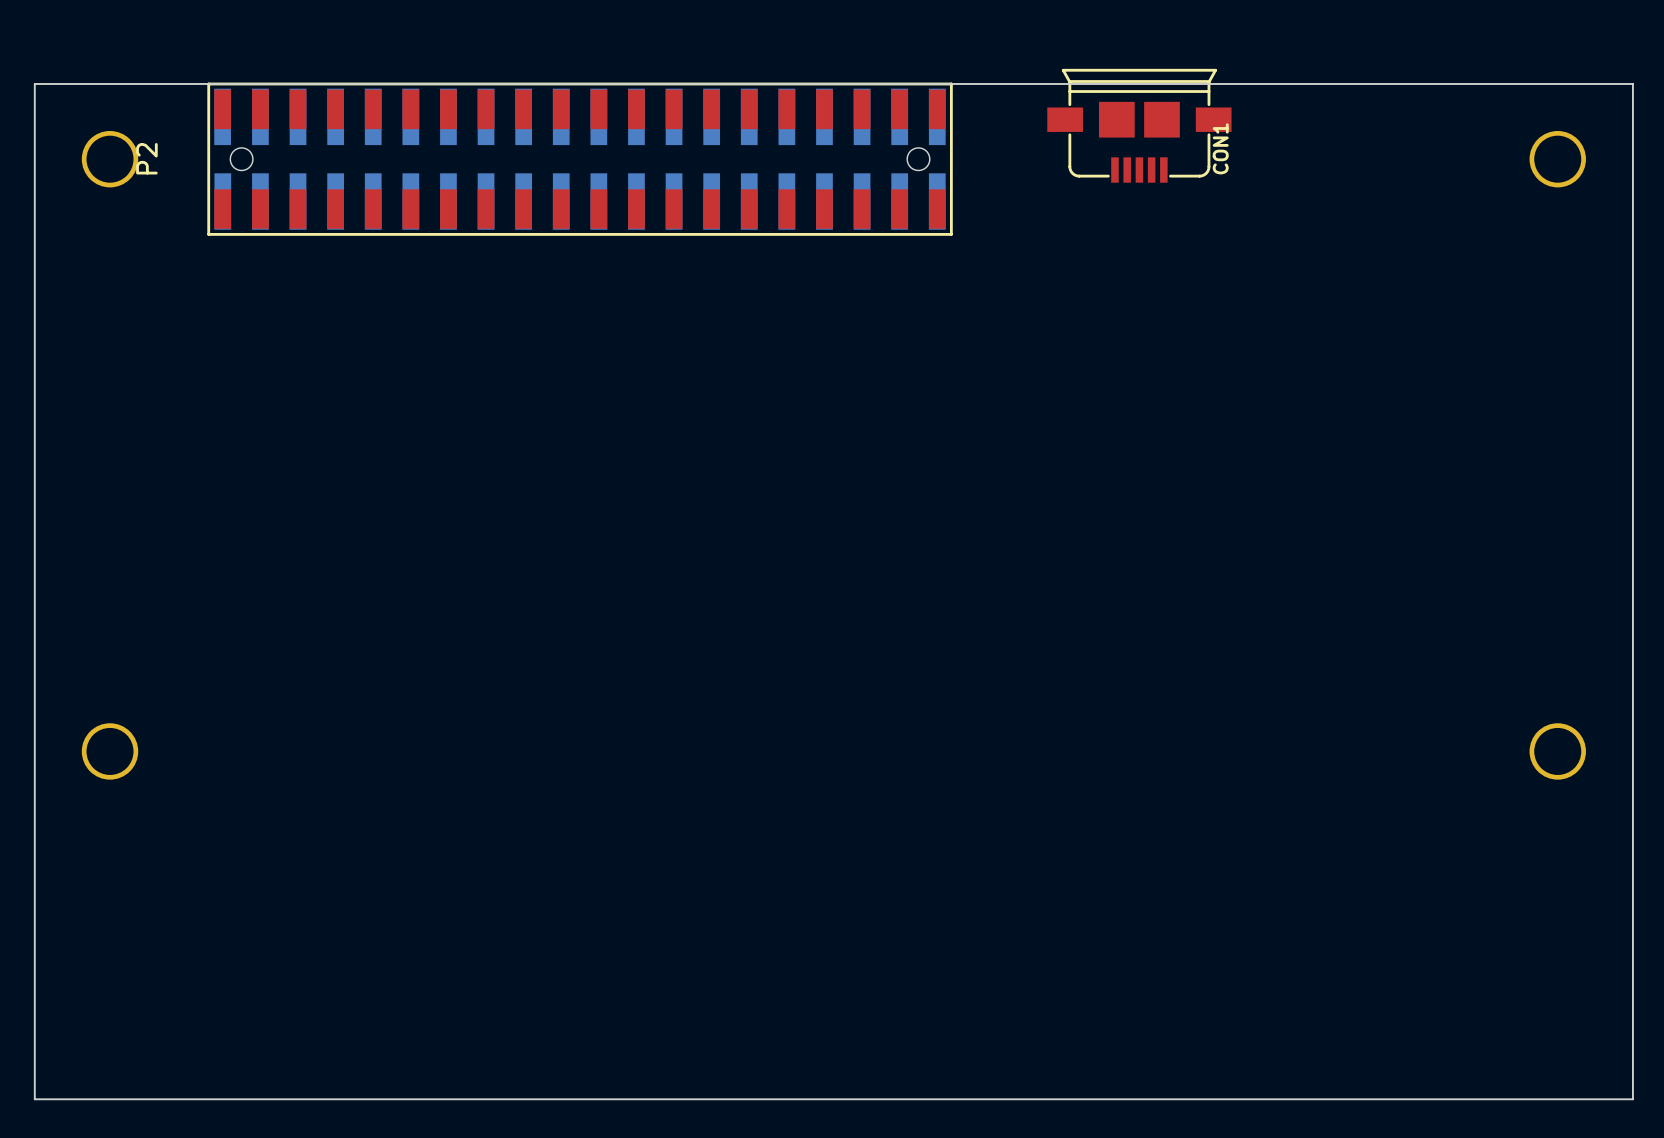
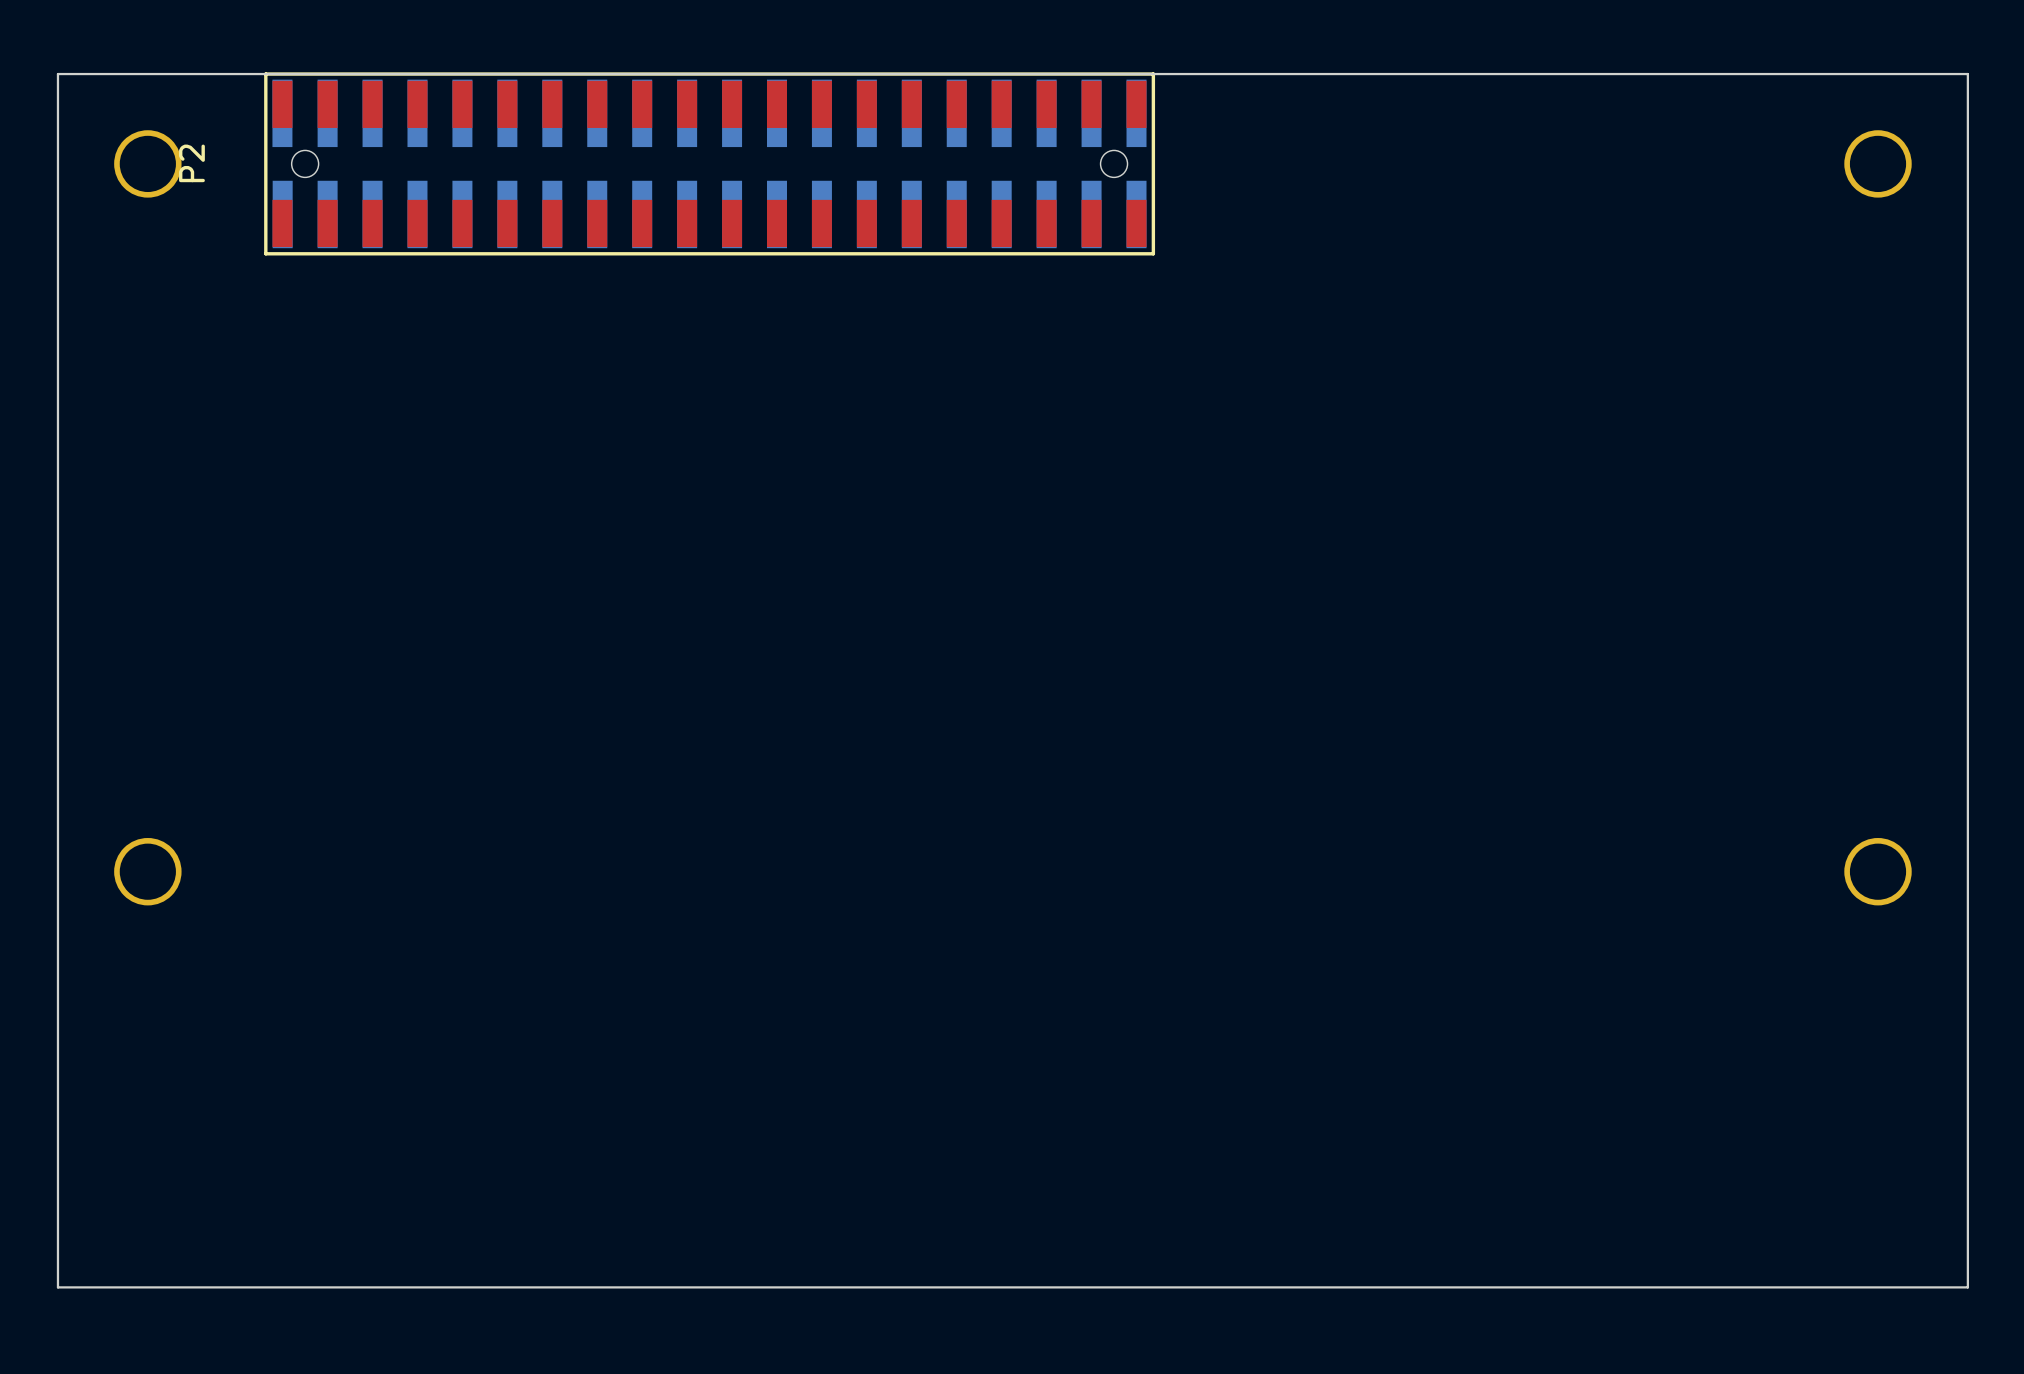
CON1: (1139, 125) -> none

